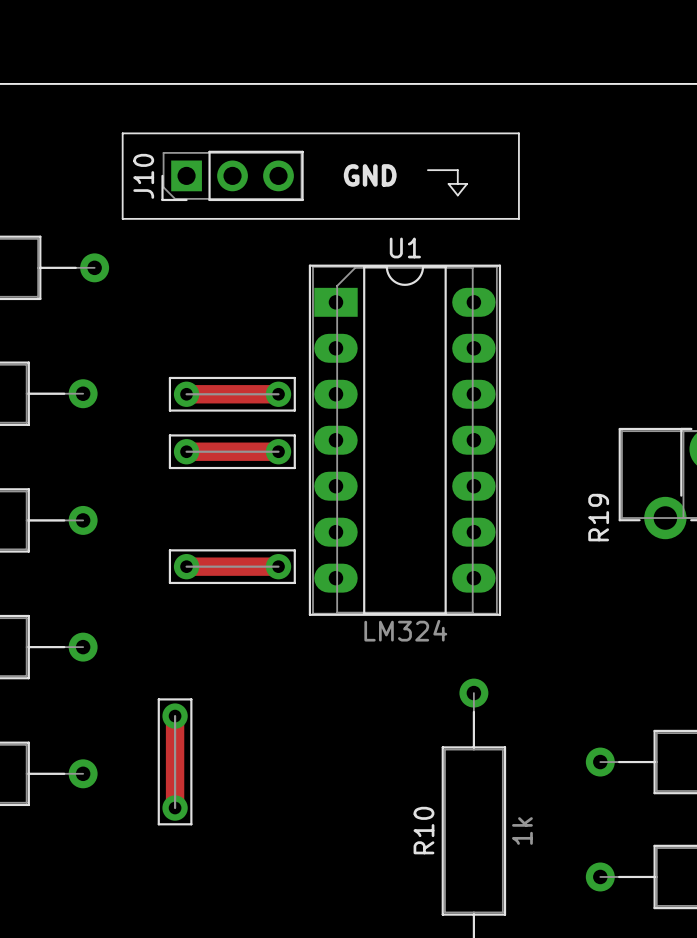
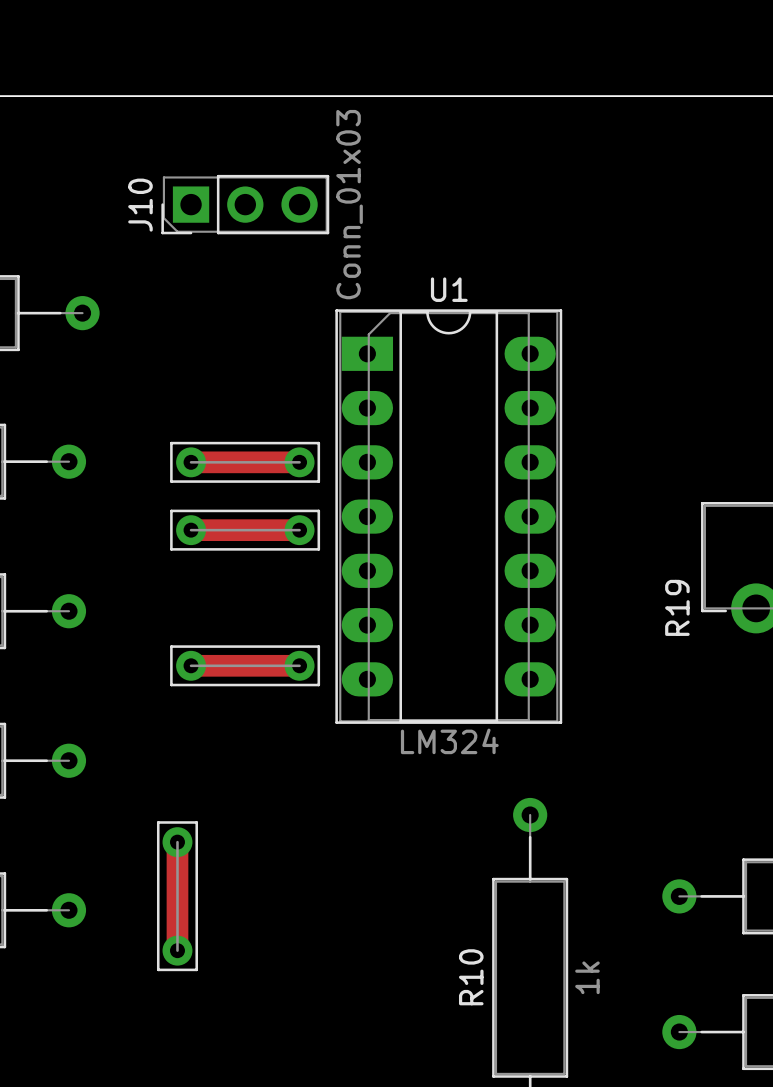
line: (122, 133) (518, 133) (518, 218) (122, 218) (122, 133) -> none
line: (427, 170) (457, 170) (457, 183) -> none
J10 value: none -> Conn_01x03 (349, 204)
text: GND (370, 175) -> none
line: (448, 183) (467, 183) (457, 195) (448, 183) -> none

